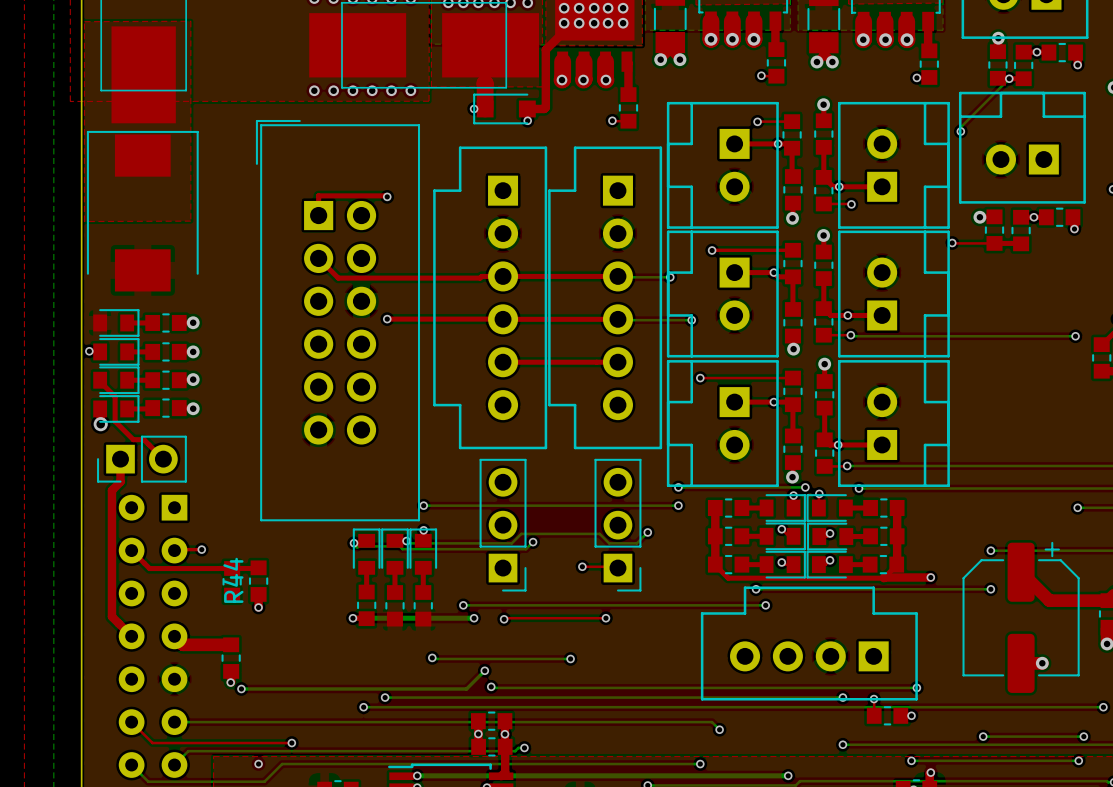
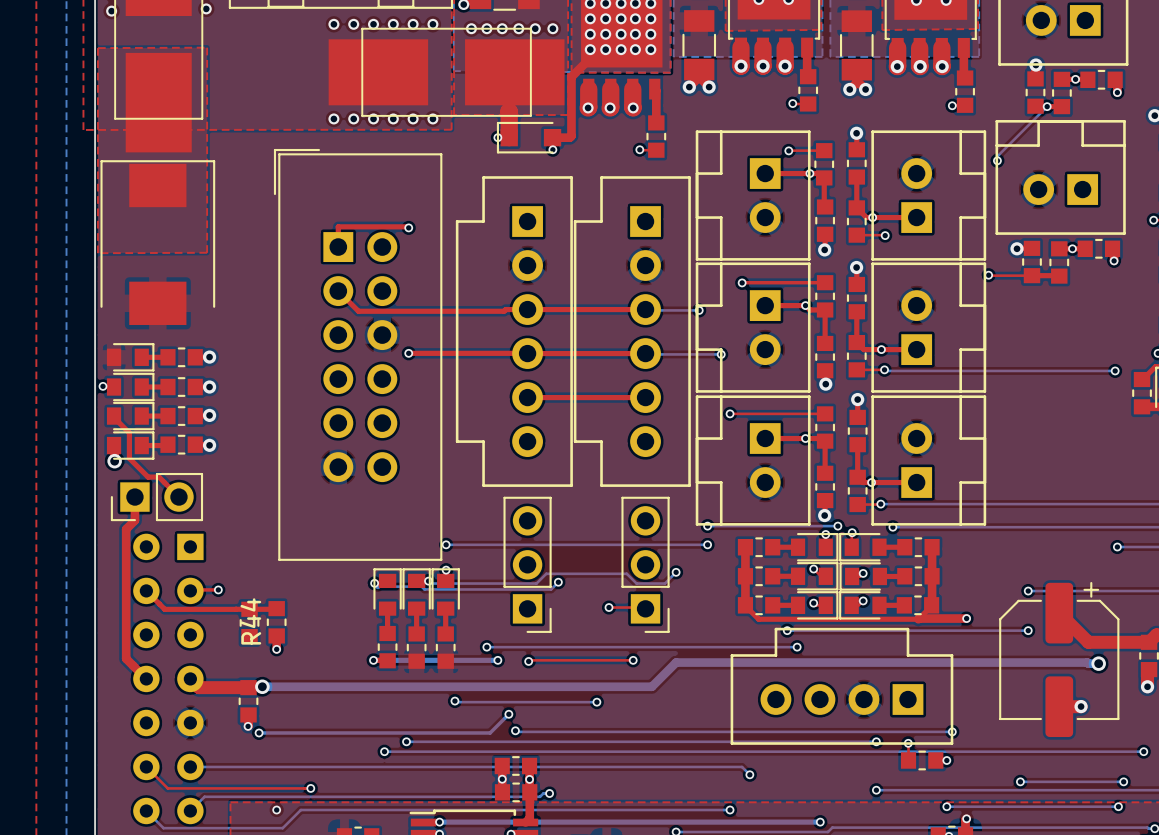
bottom track: none -> (1098, 663) (676, 662) (651, 686) (262, 686)
via: none -> (1098, 663)
via: none -> (262, 686)

